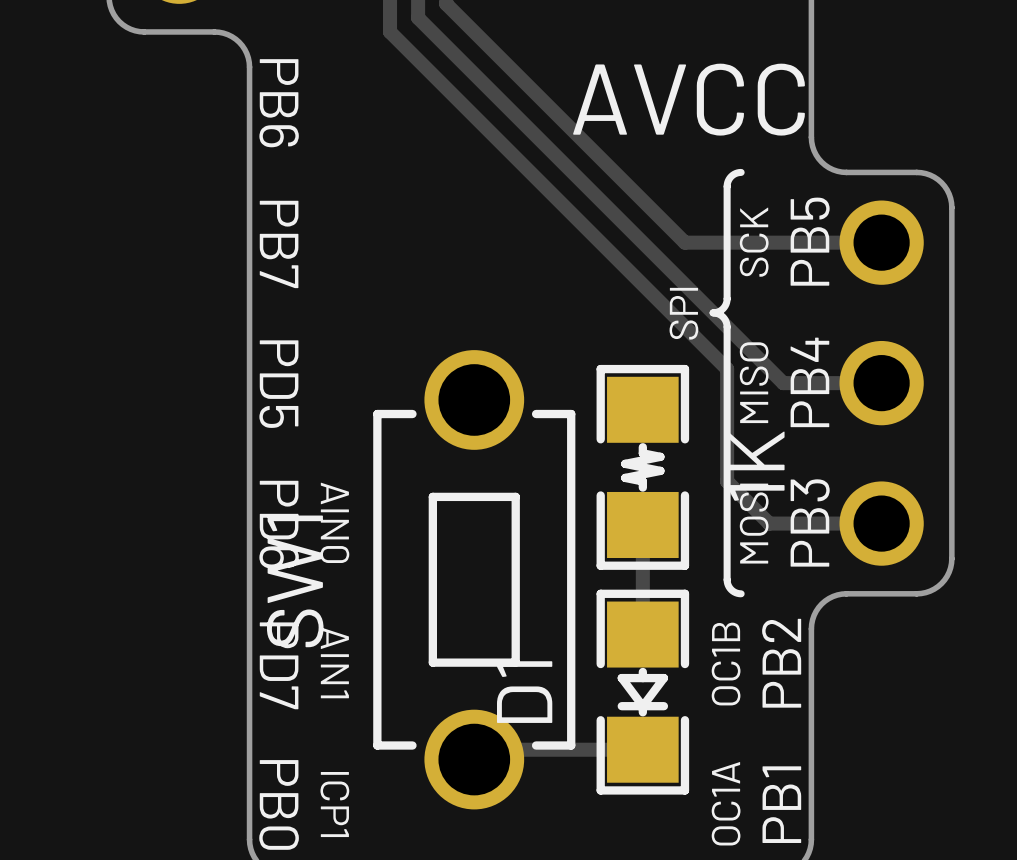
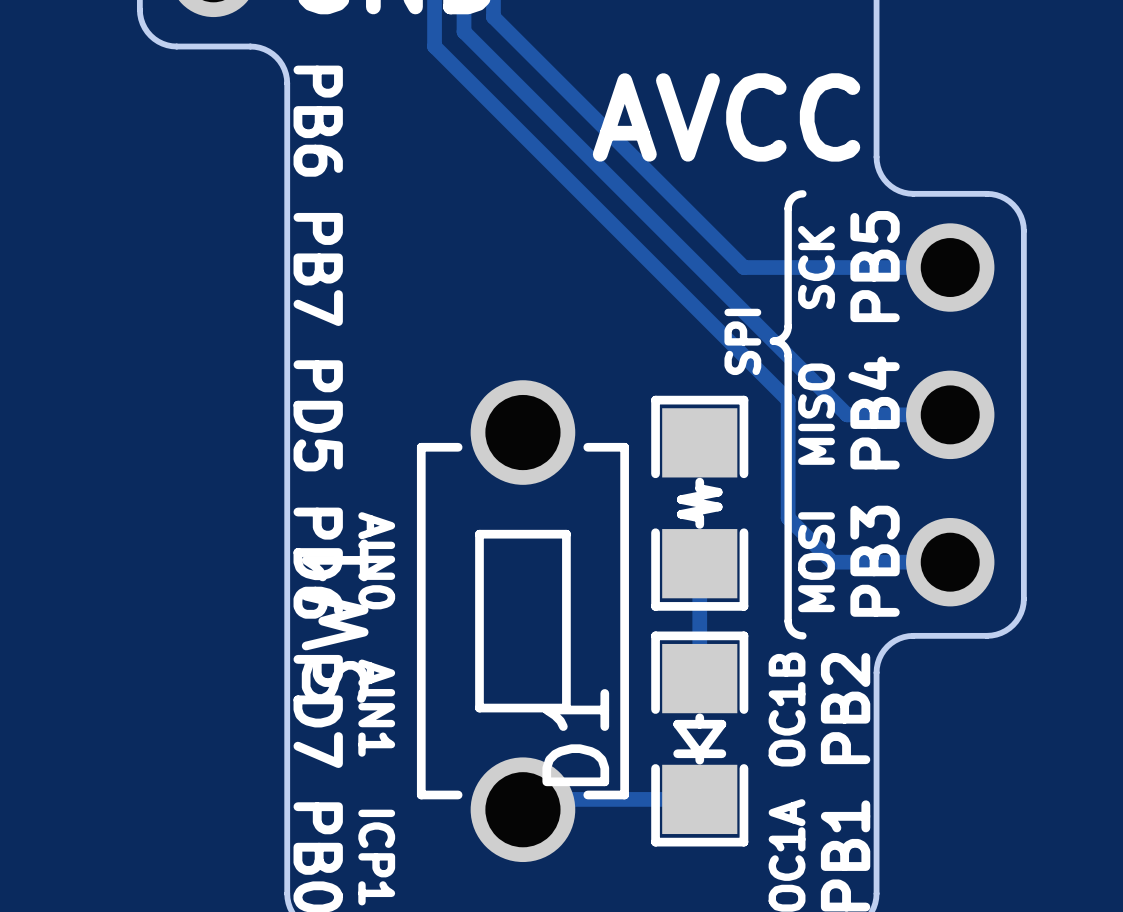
part value: 1K (756, 466) -> none

